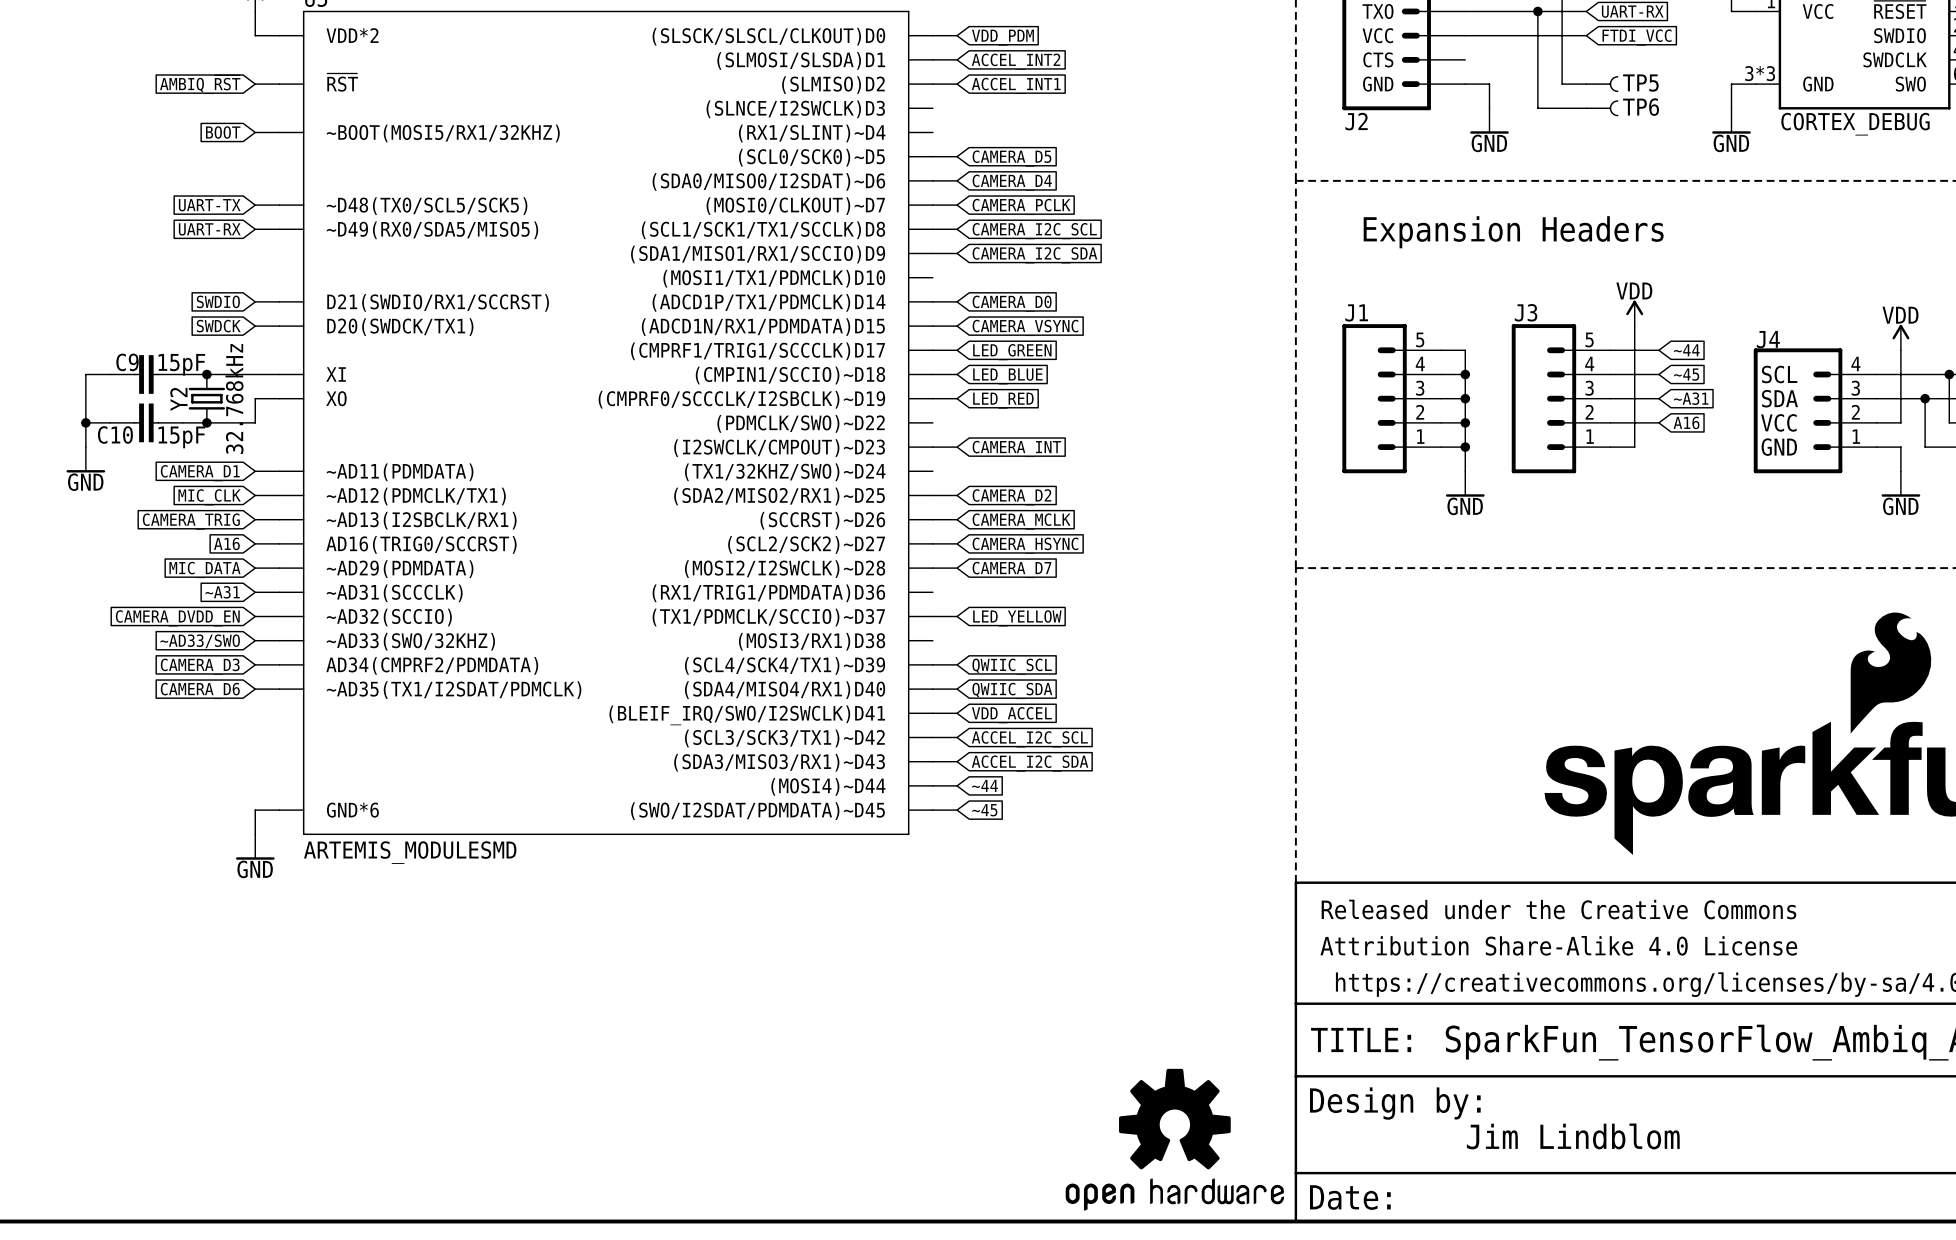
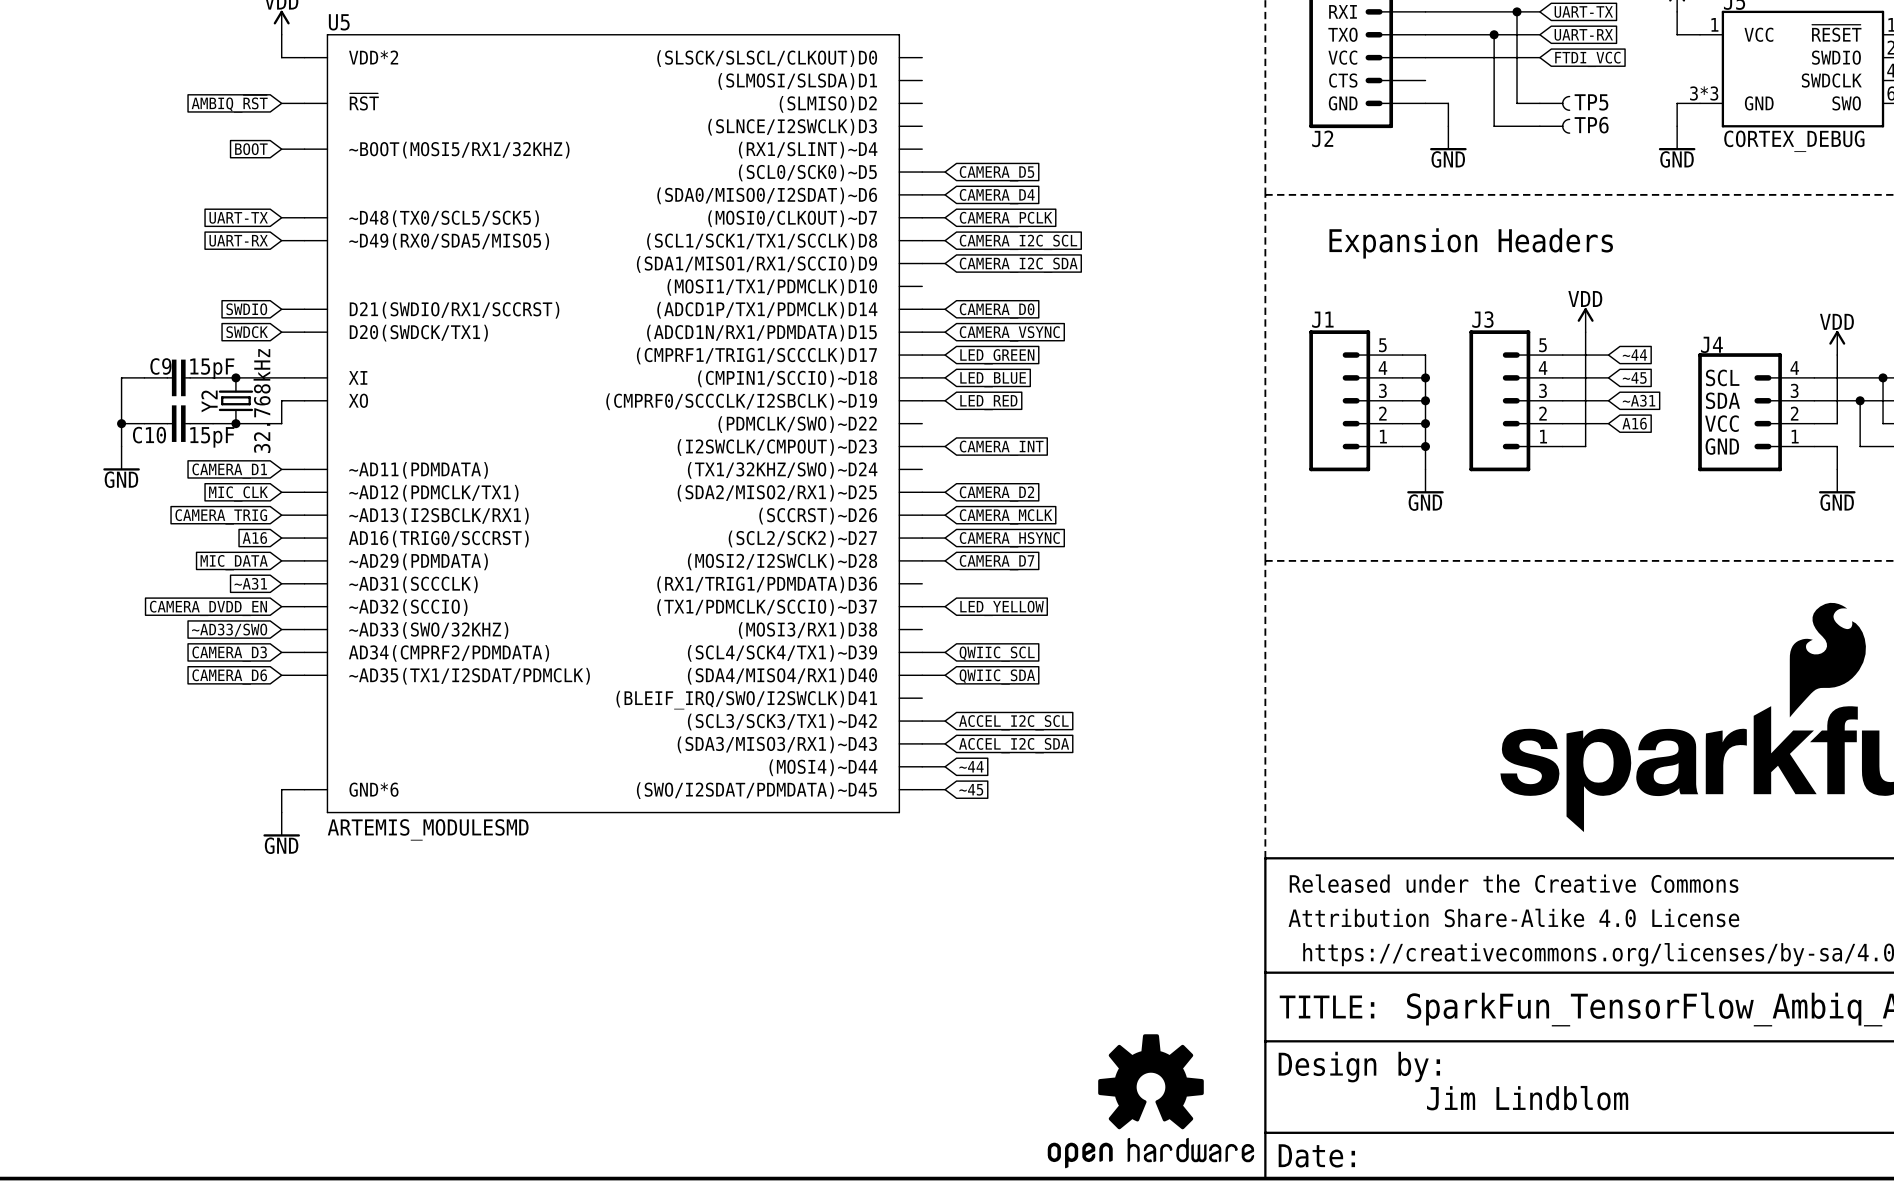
wire: (932, 35) (957, 35) -> none
global label: VDD_PDM (1002, 37) -> none
wire: (932, 59) (957, 59) -> none
global label: ACCEL_INT2 (1016, 61) -> none
wire: (932, 84) (957, 84) -> none
global label: ACCEL_INT1 (1016, 85) -> none
wire: (932, 713) (957, 713) -> none
global label: VDD_ACCEL (1011, 715) -> none

